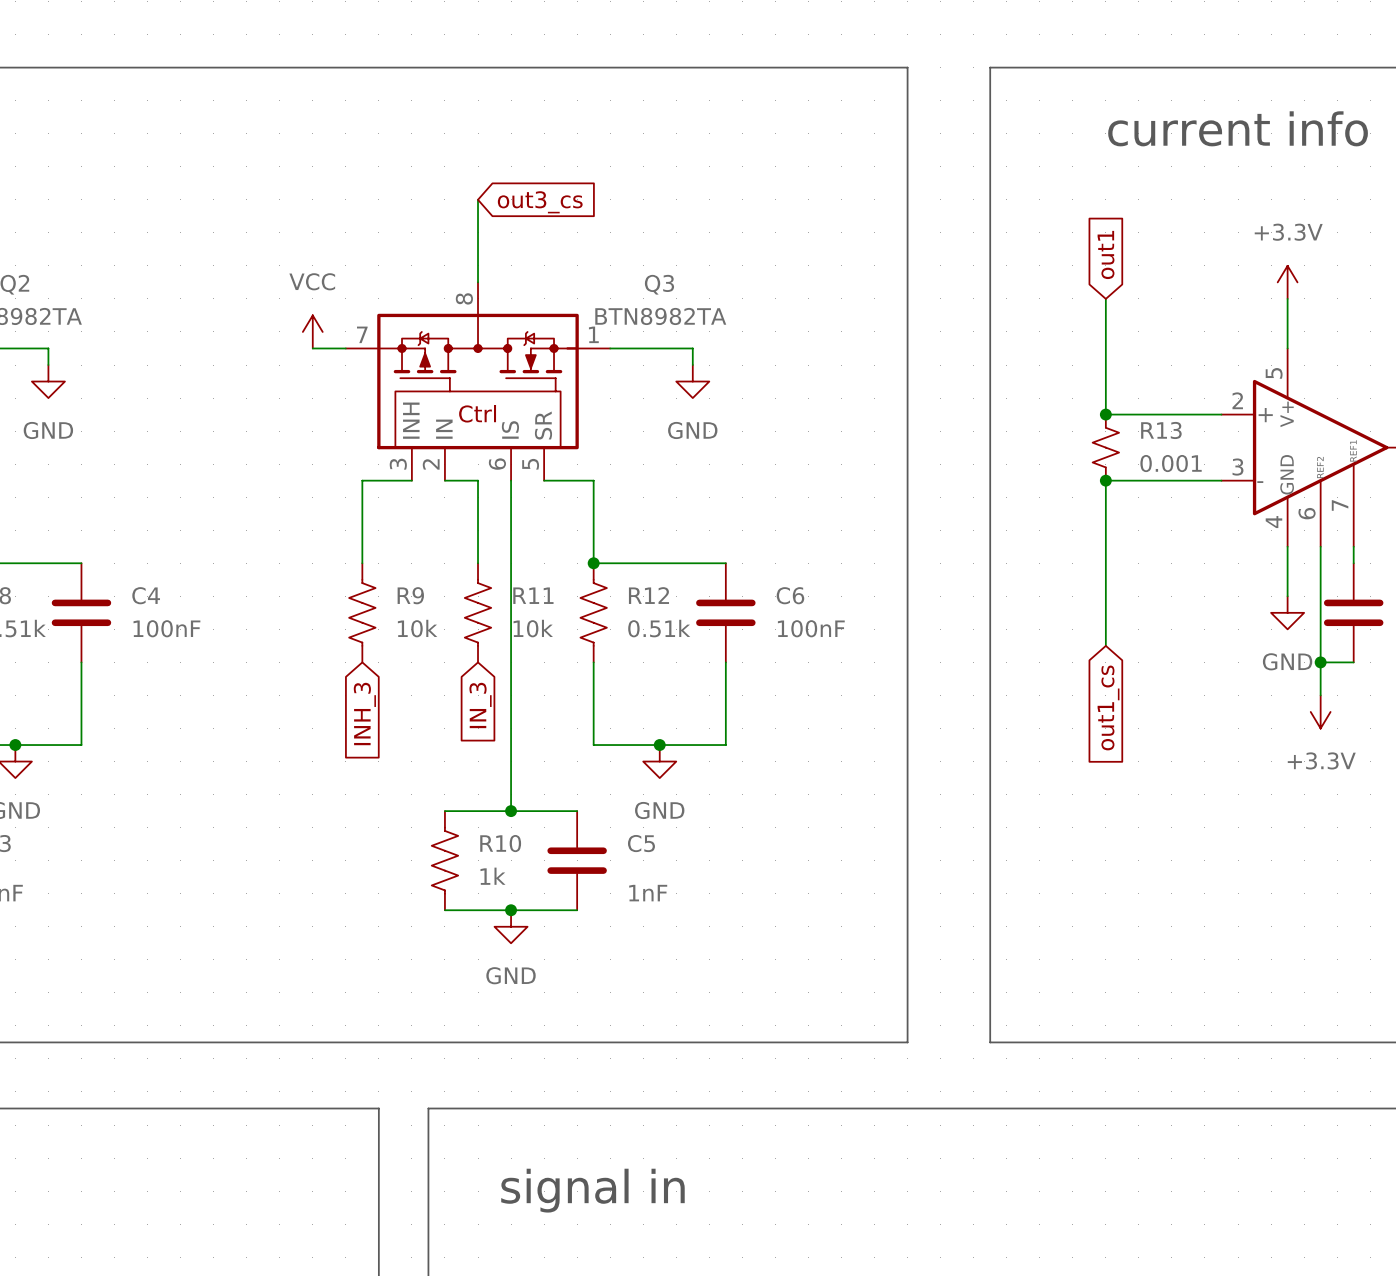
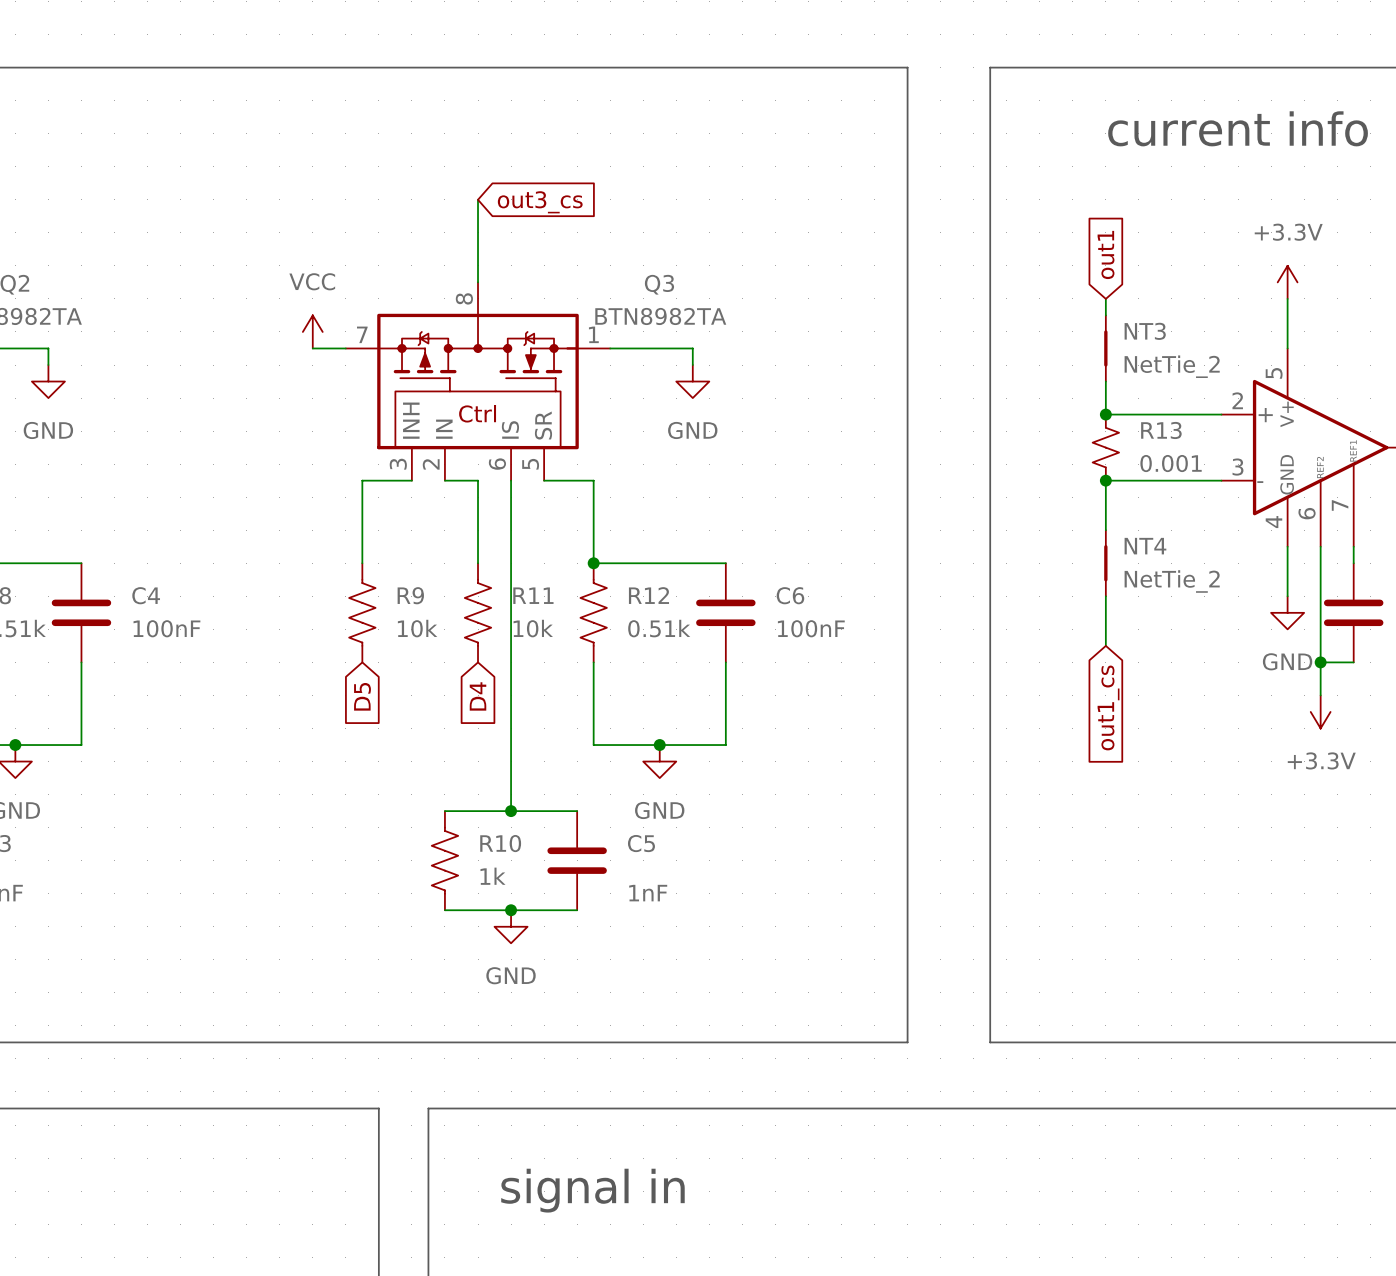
NT3: none -> NetTie_2 (1105, 348)
NT4: none -> NetTie_2 (1105, 563)
global label: IN_3 (480, 705) -> D4 (478, 696)
global label: INH_3 (364, 714) -> D5 (362, 696)

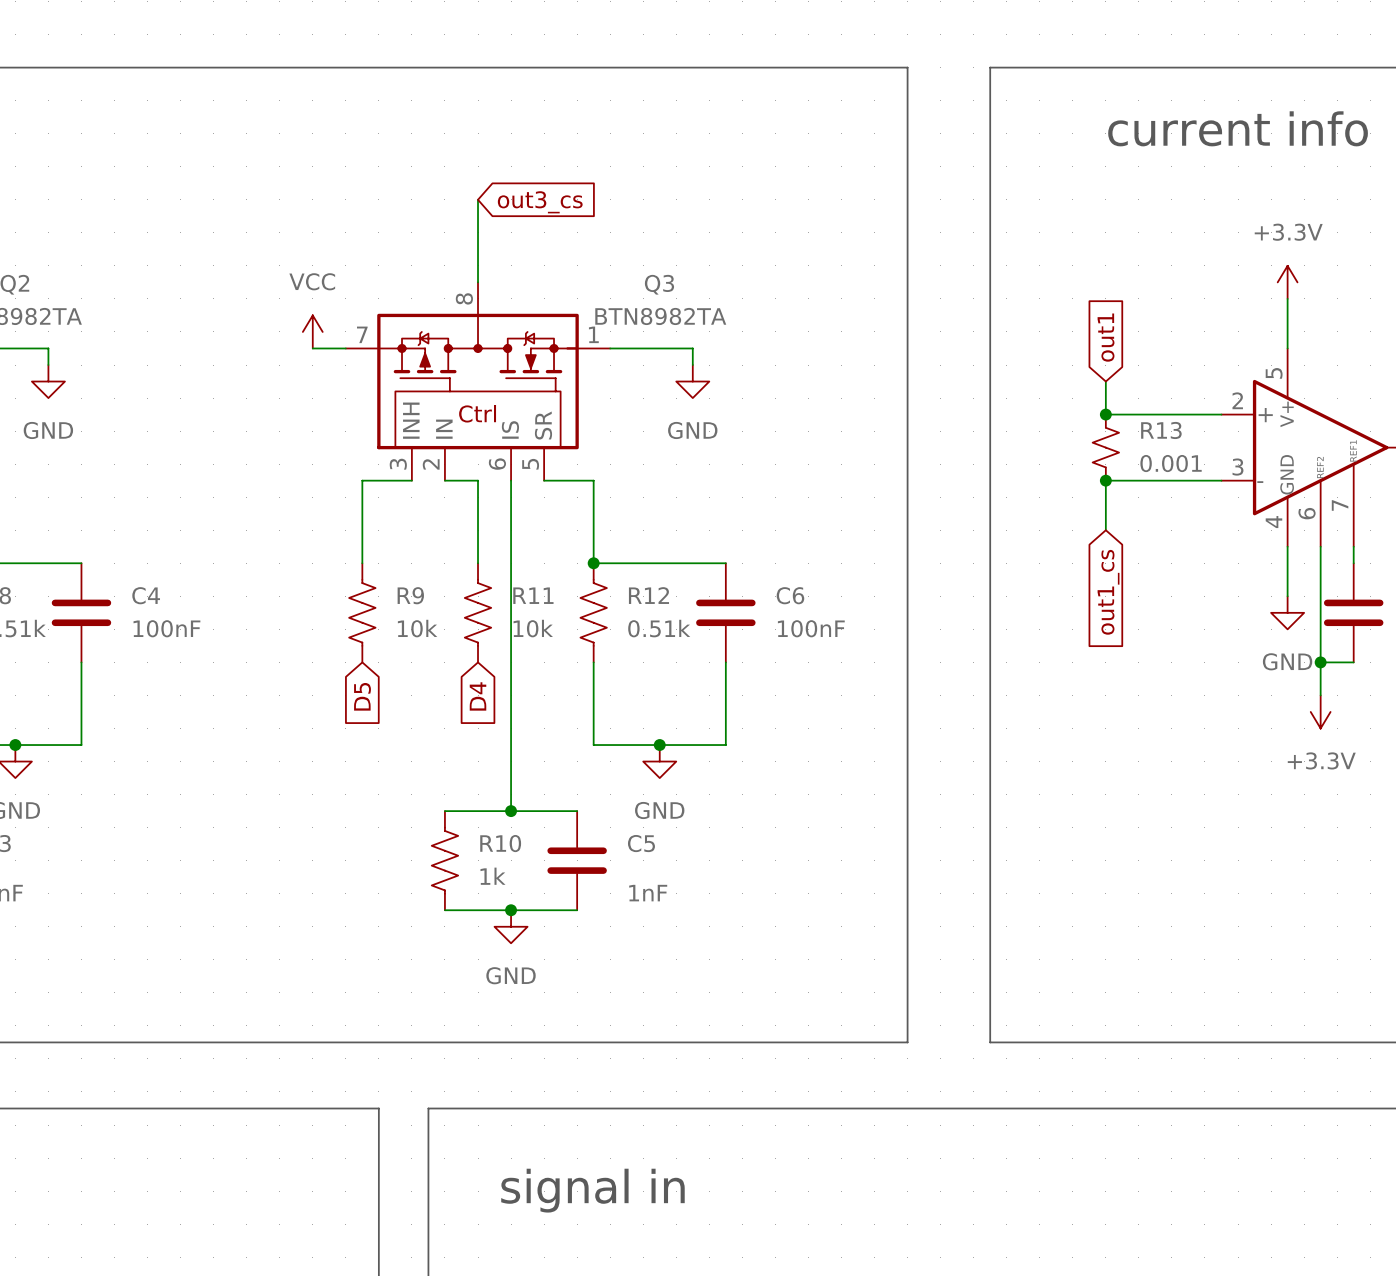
global label position: out1 (1106, 254) -> out1 (1106, 337)
wire: (1105, 298) (1105, 315) -> none
NT3: NetTie_2 (1105, 348) -> none
NT4: NetTie_2 (1105, 563) -> none
wire: (1105, 596) (1105, 645) -> none
global label position: out1_cs (1108, 707) -> out1_cs (1108, 592)

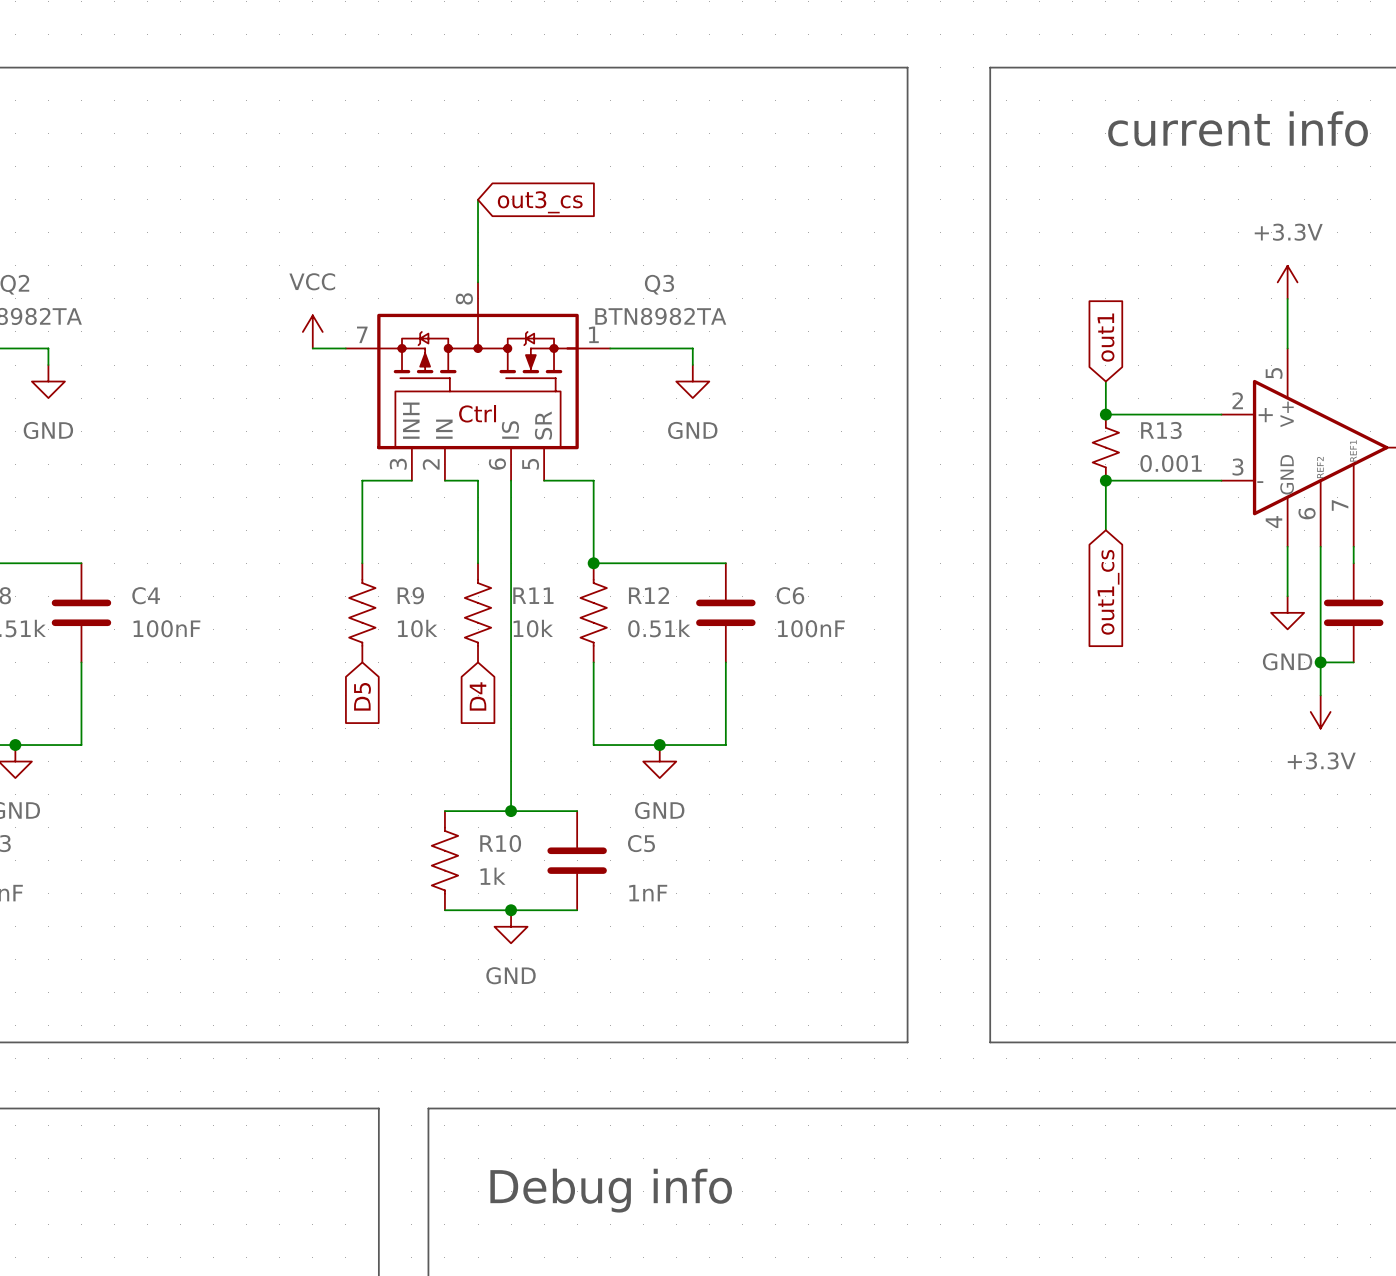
text: signal in (592, 1190) -> none
text: none -> Debug info (611, 1190)

